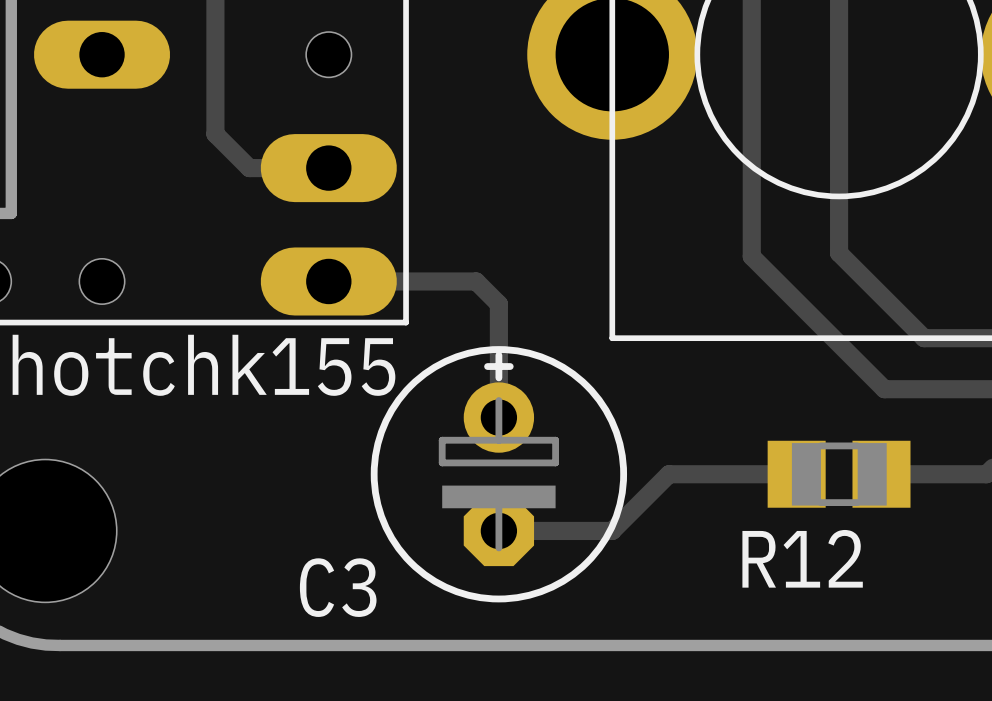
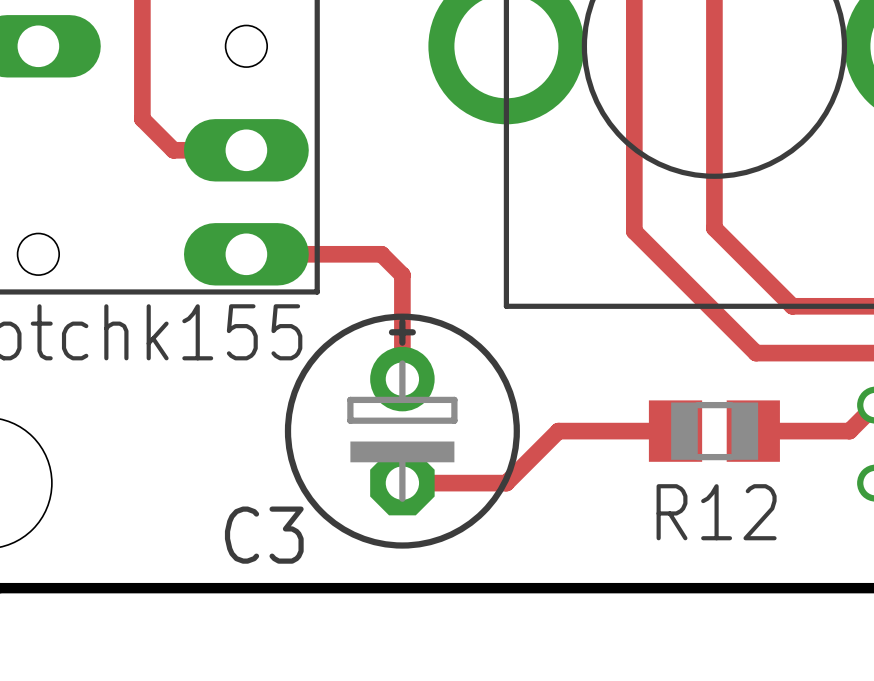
R12 name position: R12 (802, 558) -> R12 (716, 512)

